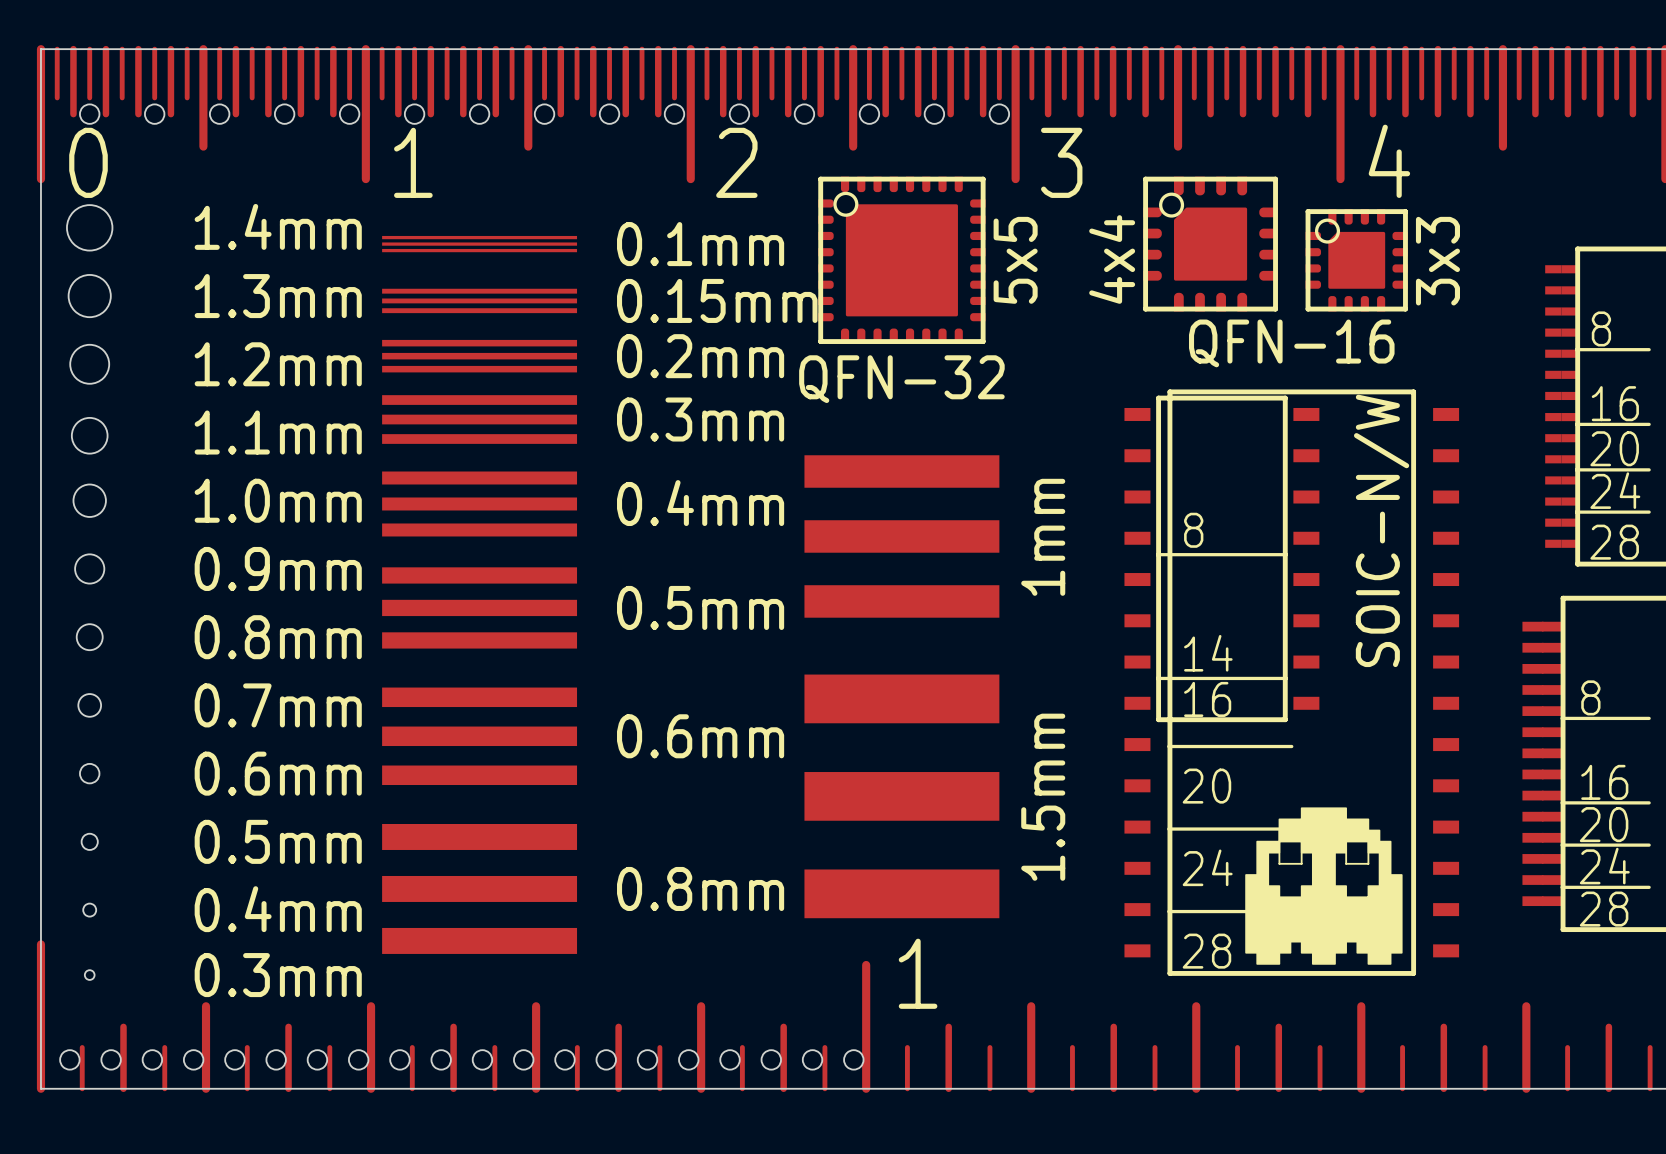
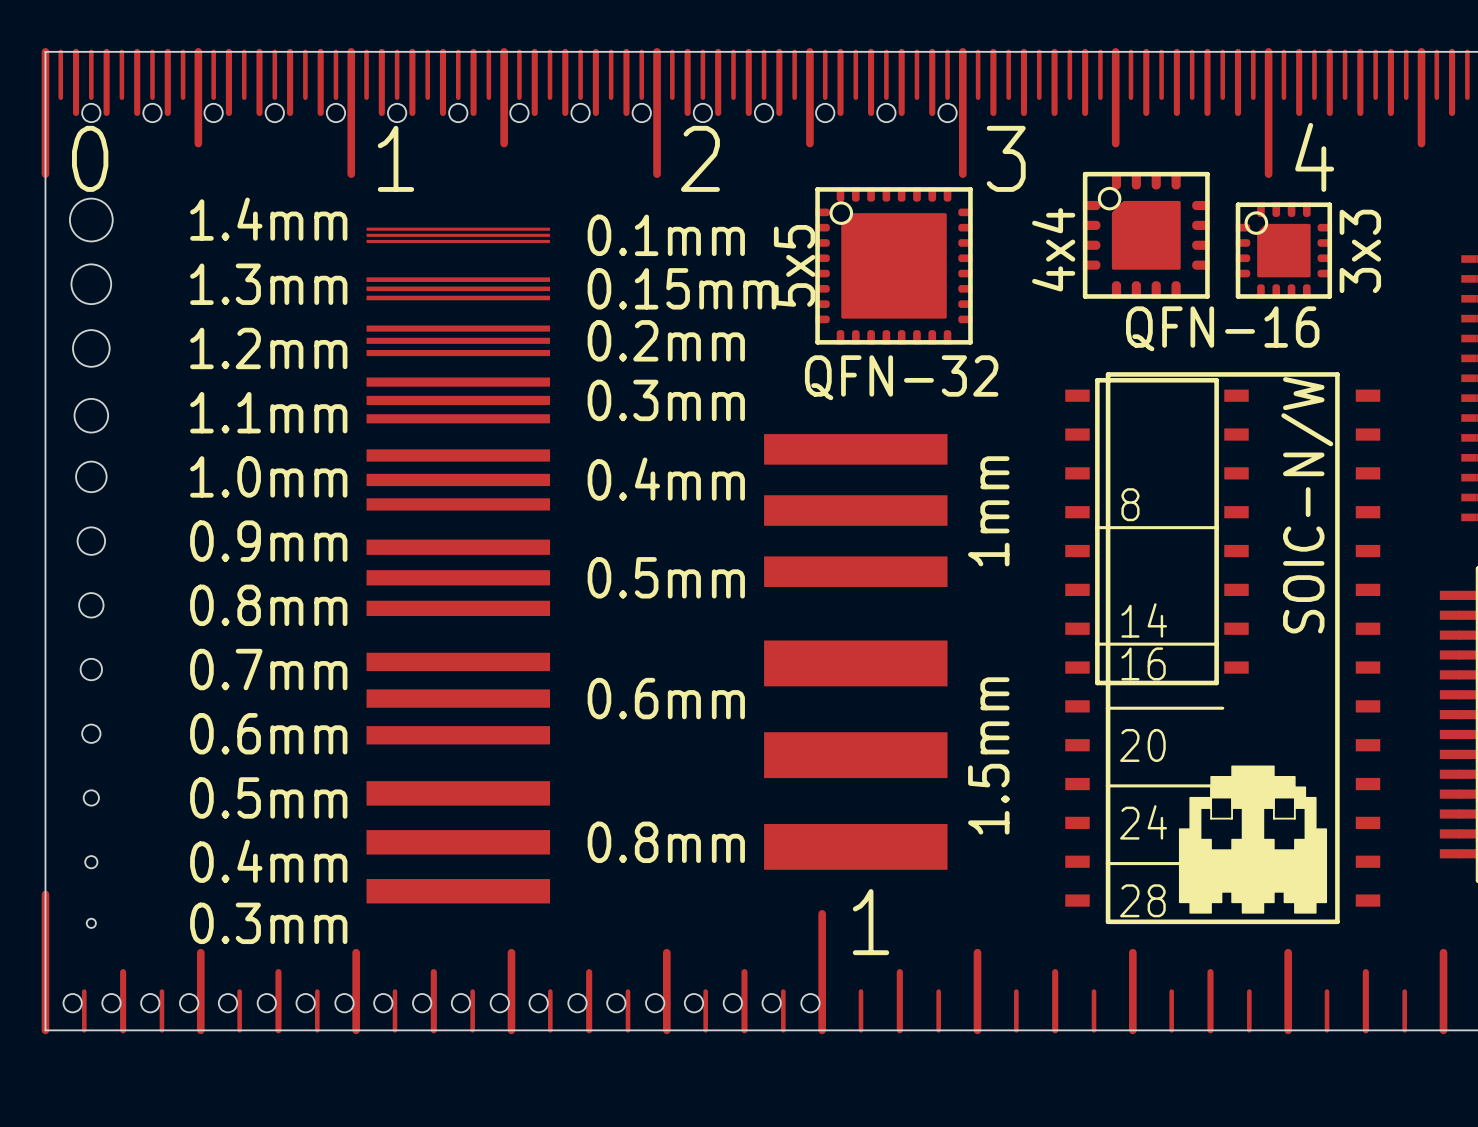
drawing position: (901, 260) -> (894, 265)
text position: 5x5 (1015, 260) -> 5x5 (794, 265)
text position: QFN-32 (901, 379) -> QFN-32 (901, 377)

